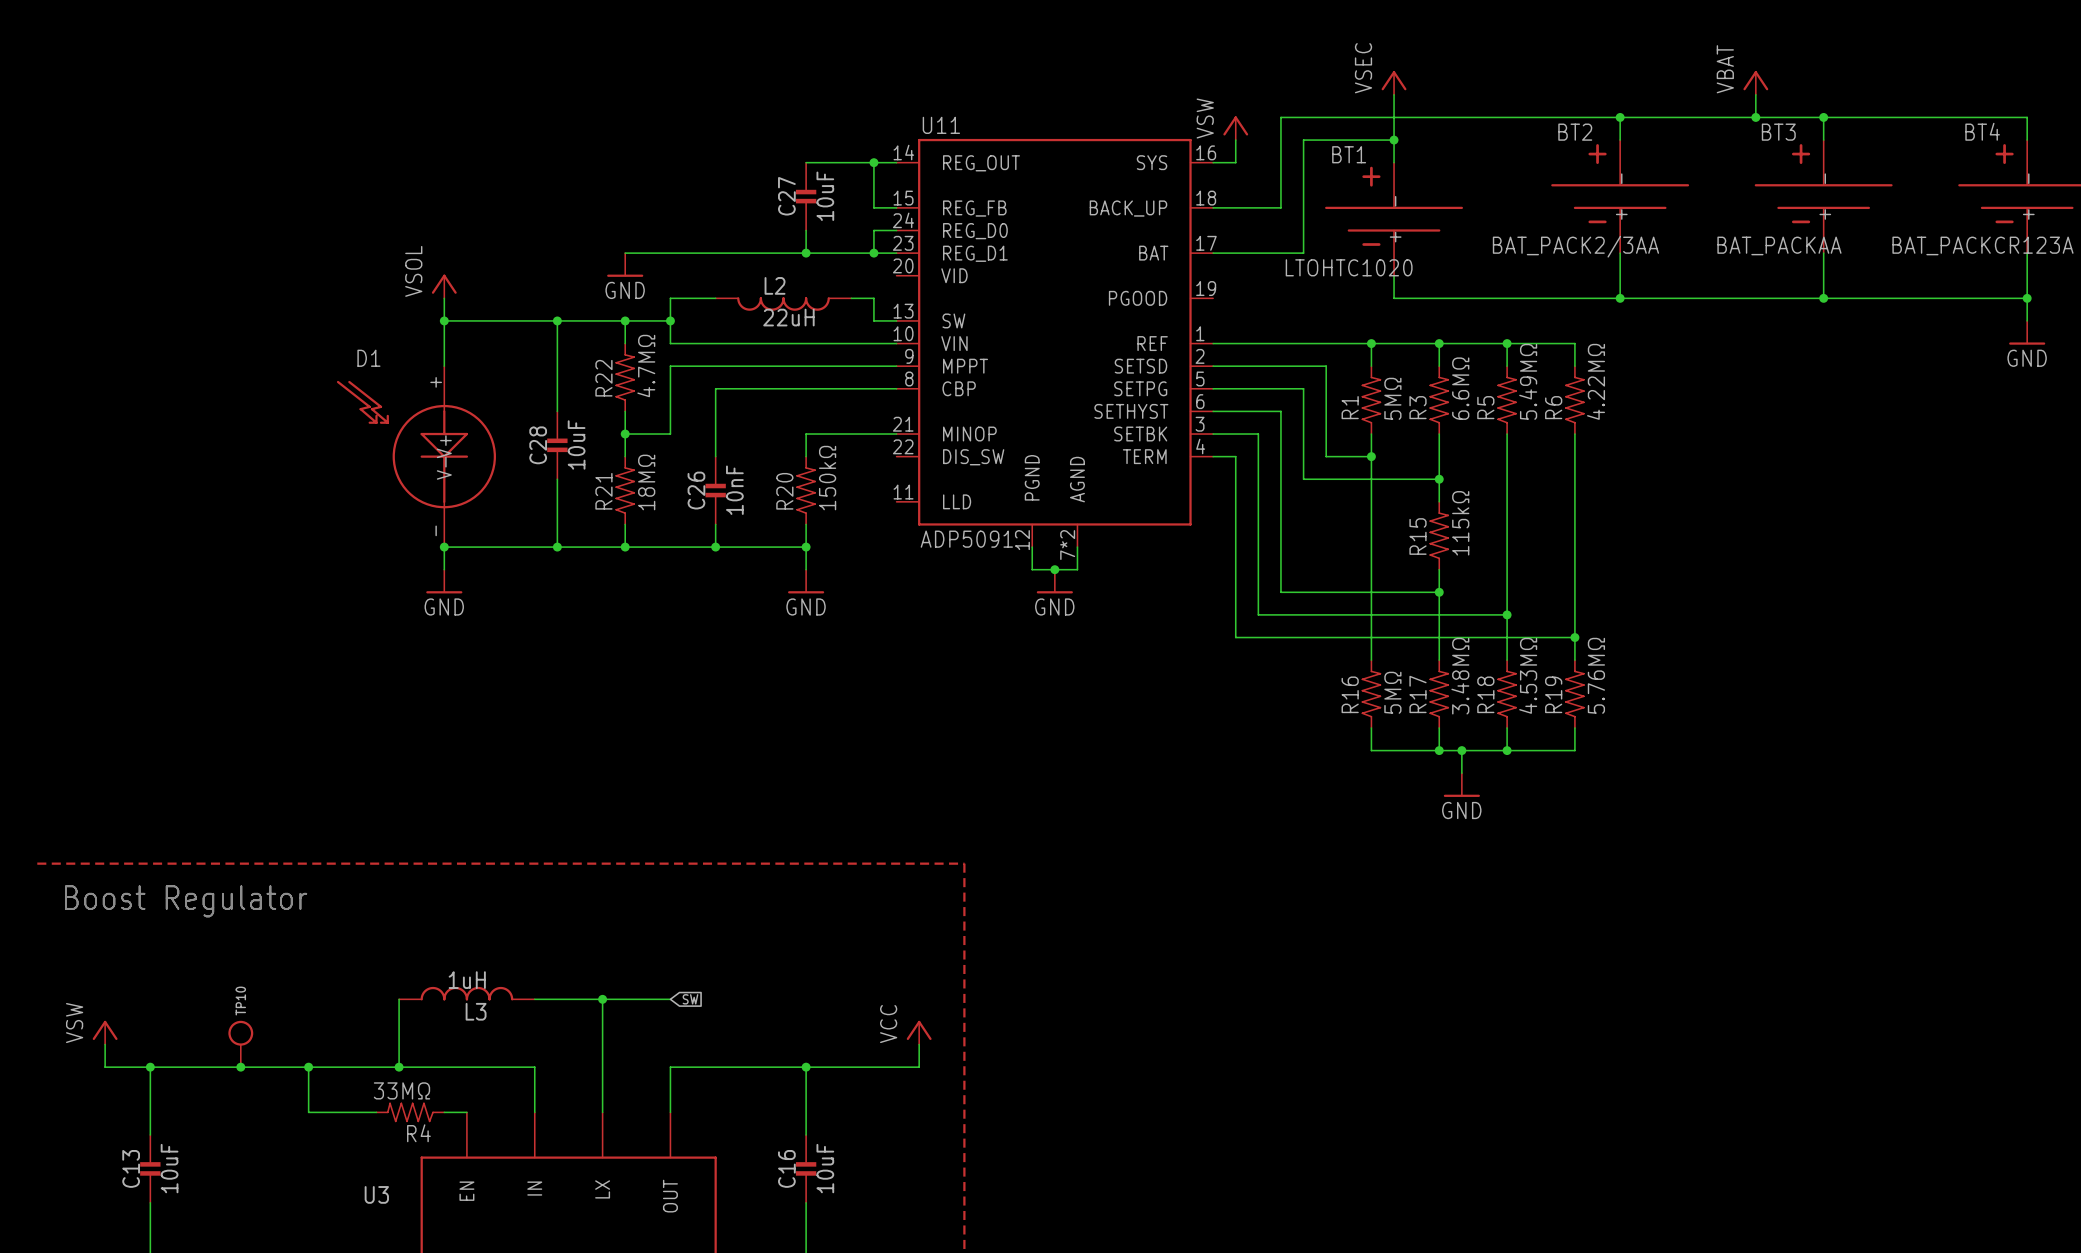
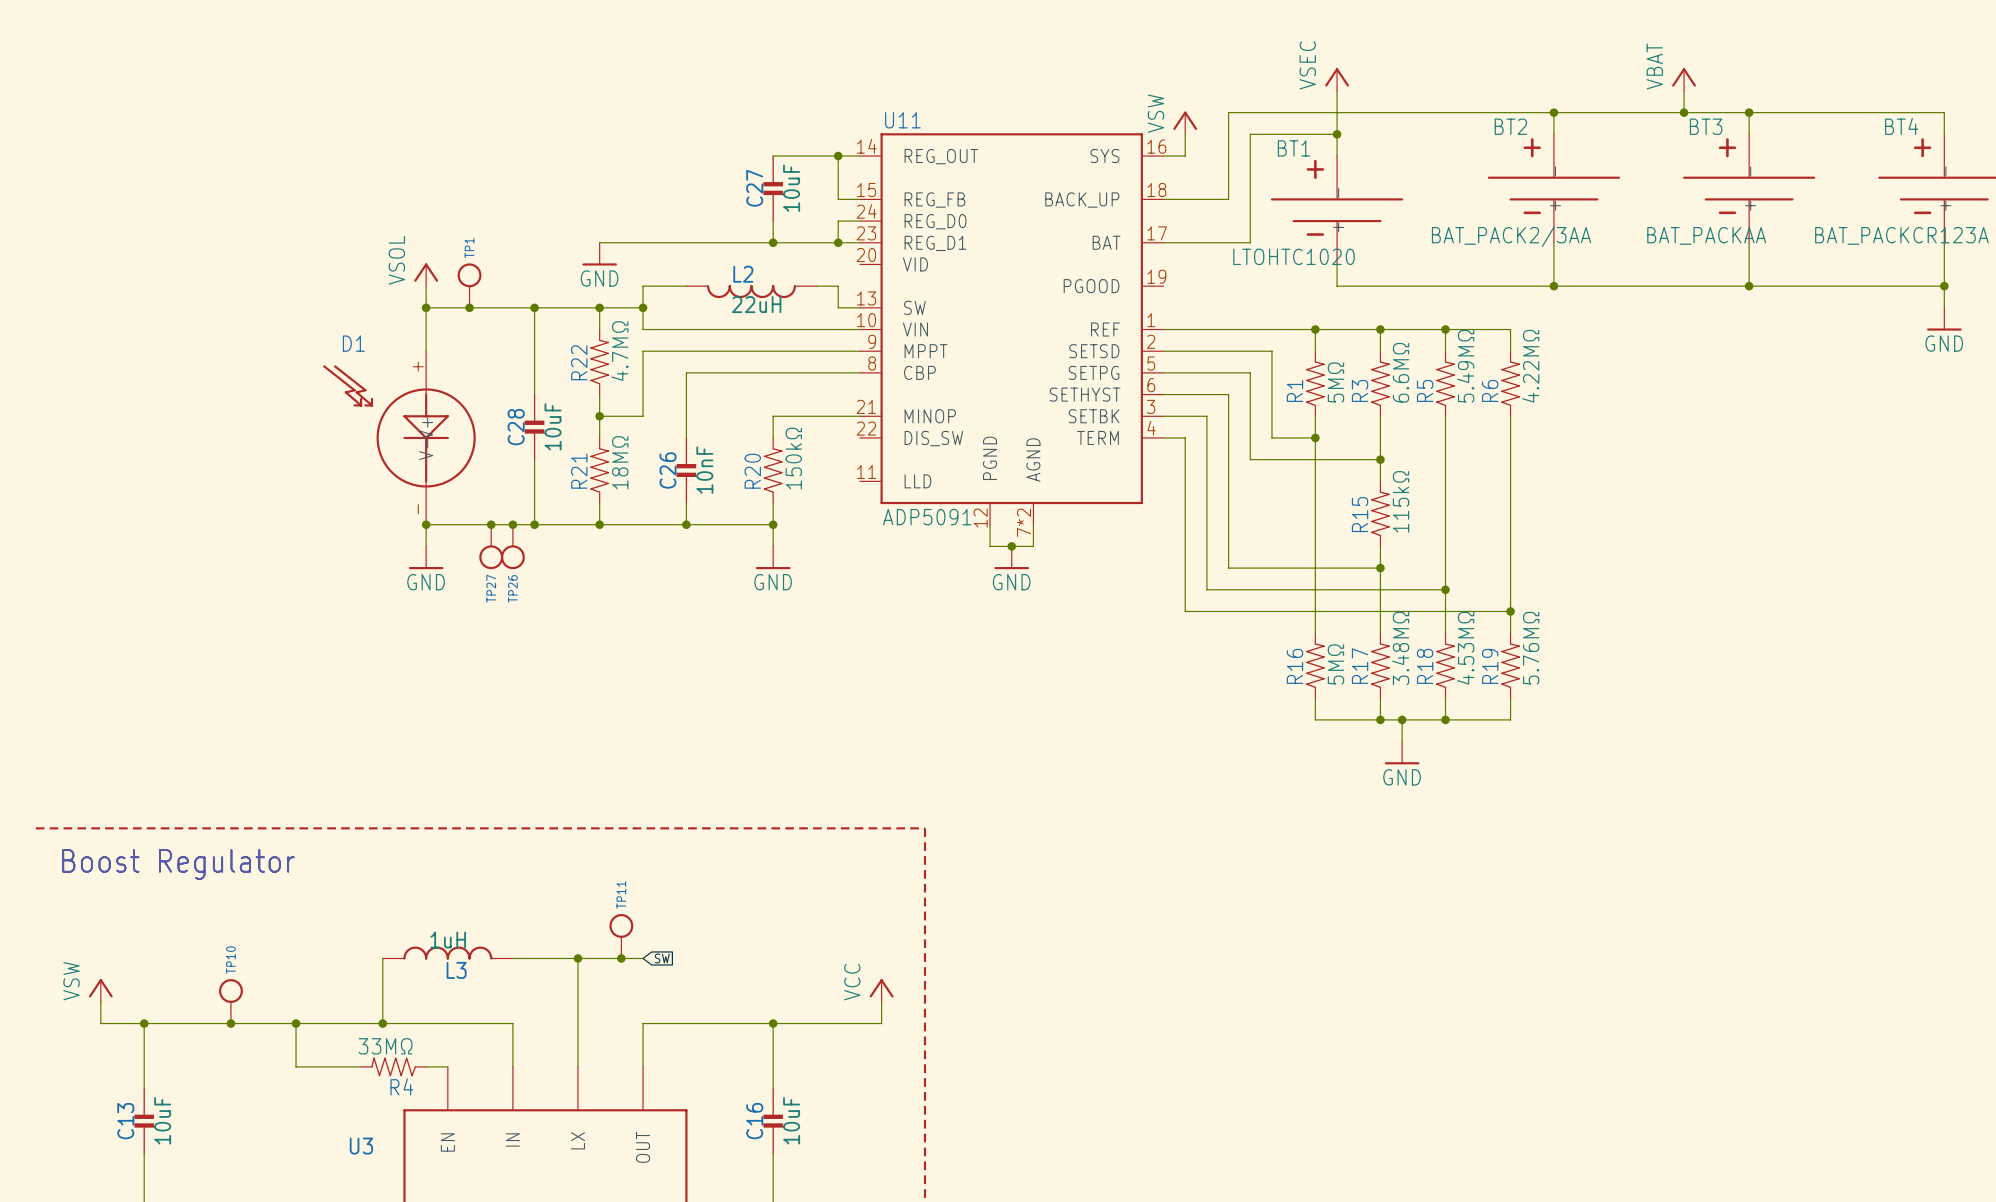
TP1: none -> (469, 285)
junction: none -> (469, 307)
junction: none -> (491, 524)
junction: none -> (512, 524)
TP27: none -> (491, 546)
TP26: none -> (512, 546)
TP11: none -> (621, 936)
junction: none -> (621, 958)

